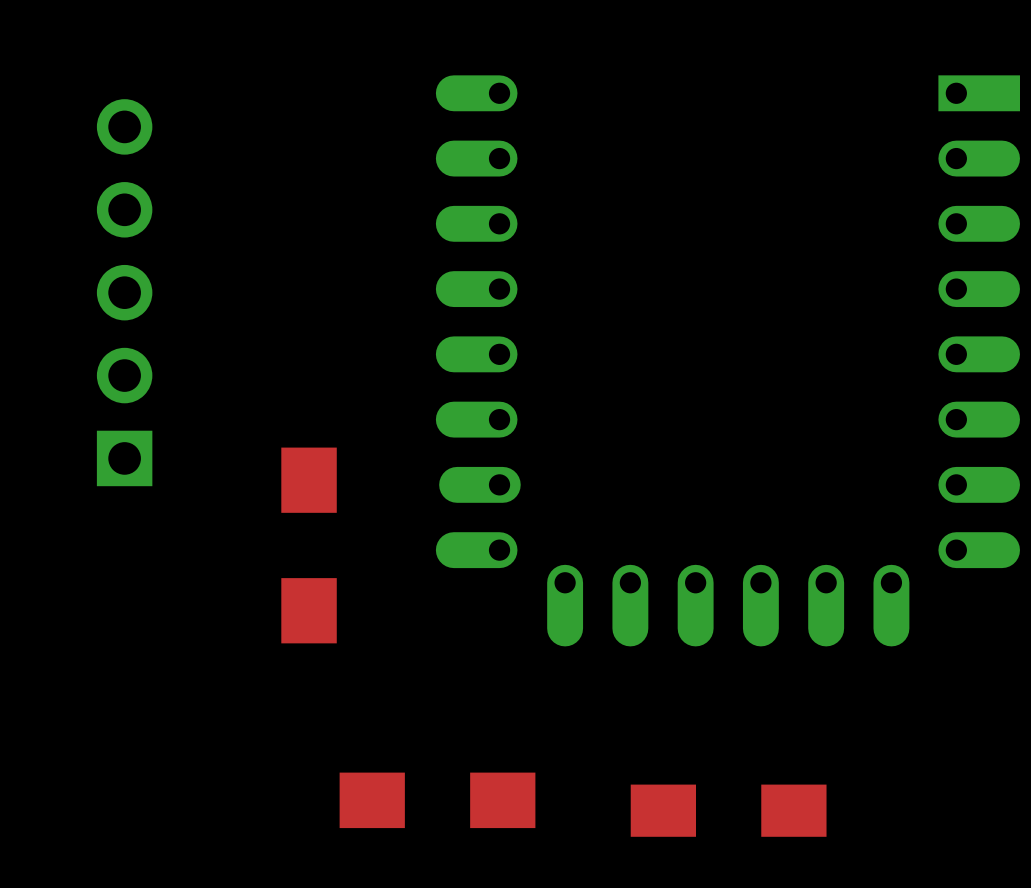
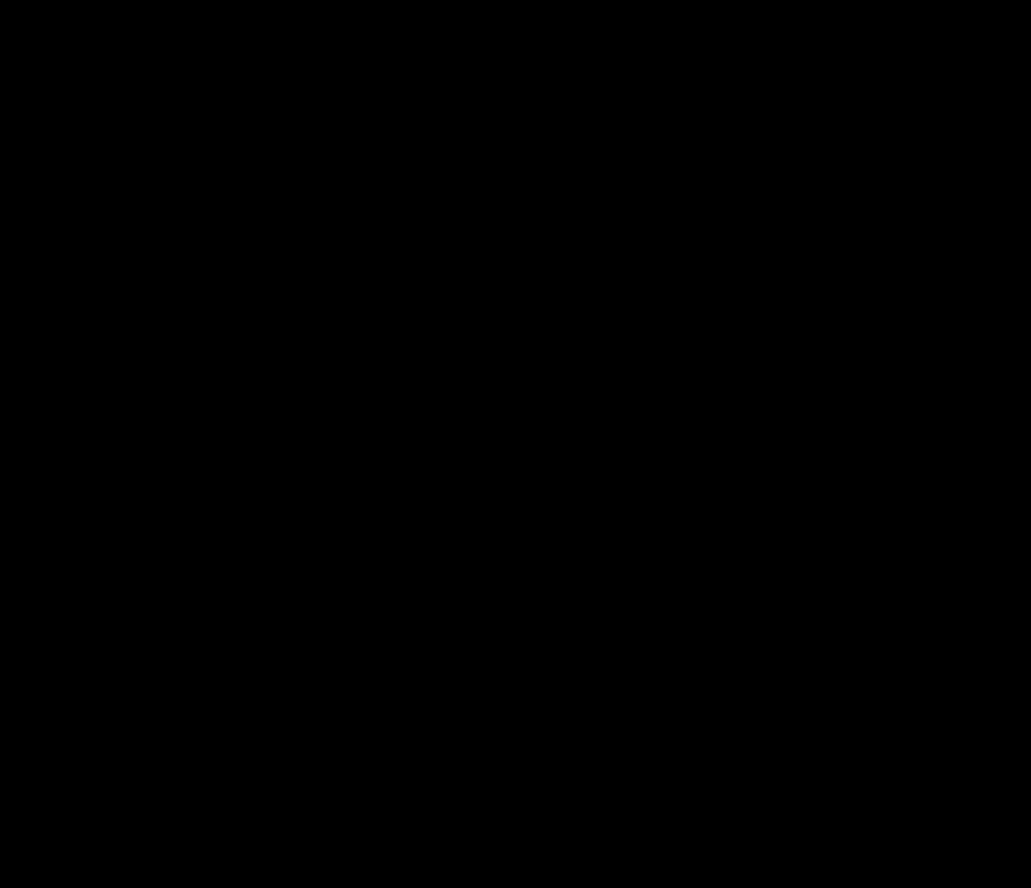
part: (124, 292) -> none
part: (727, 360) -> none
part: (309, 545) -> none
part: (437, 800) -> none
part: (728, 810) -> none

